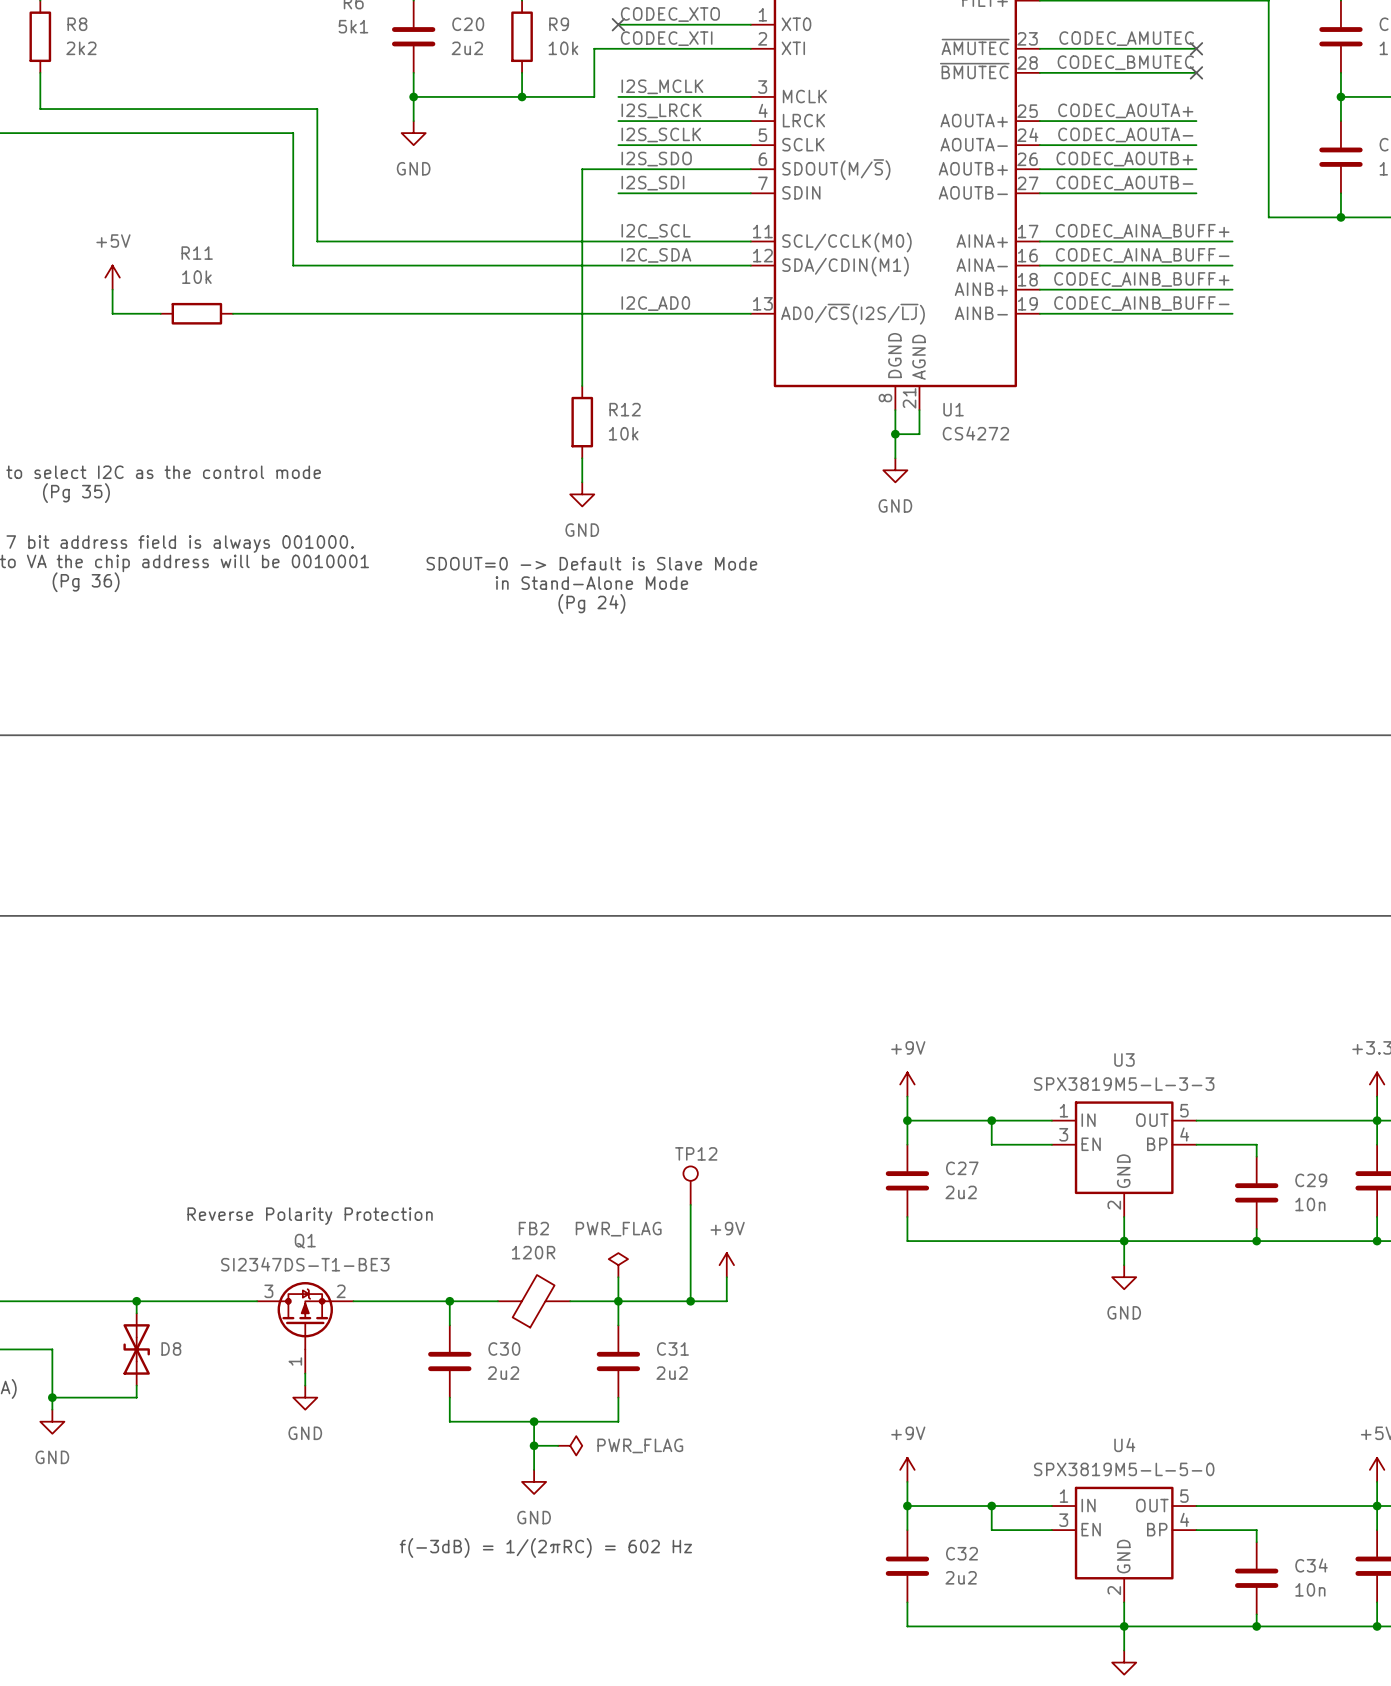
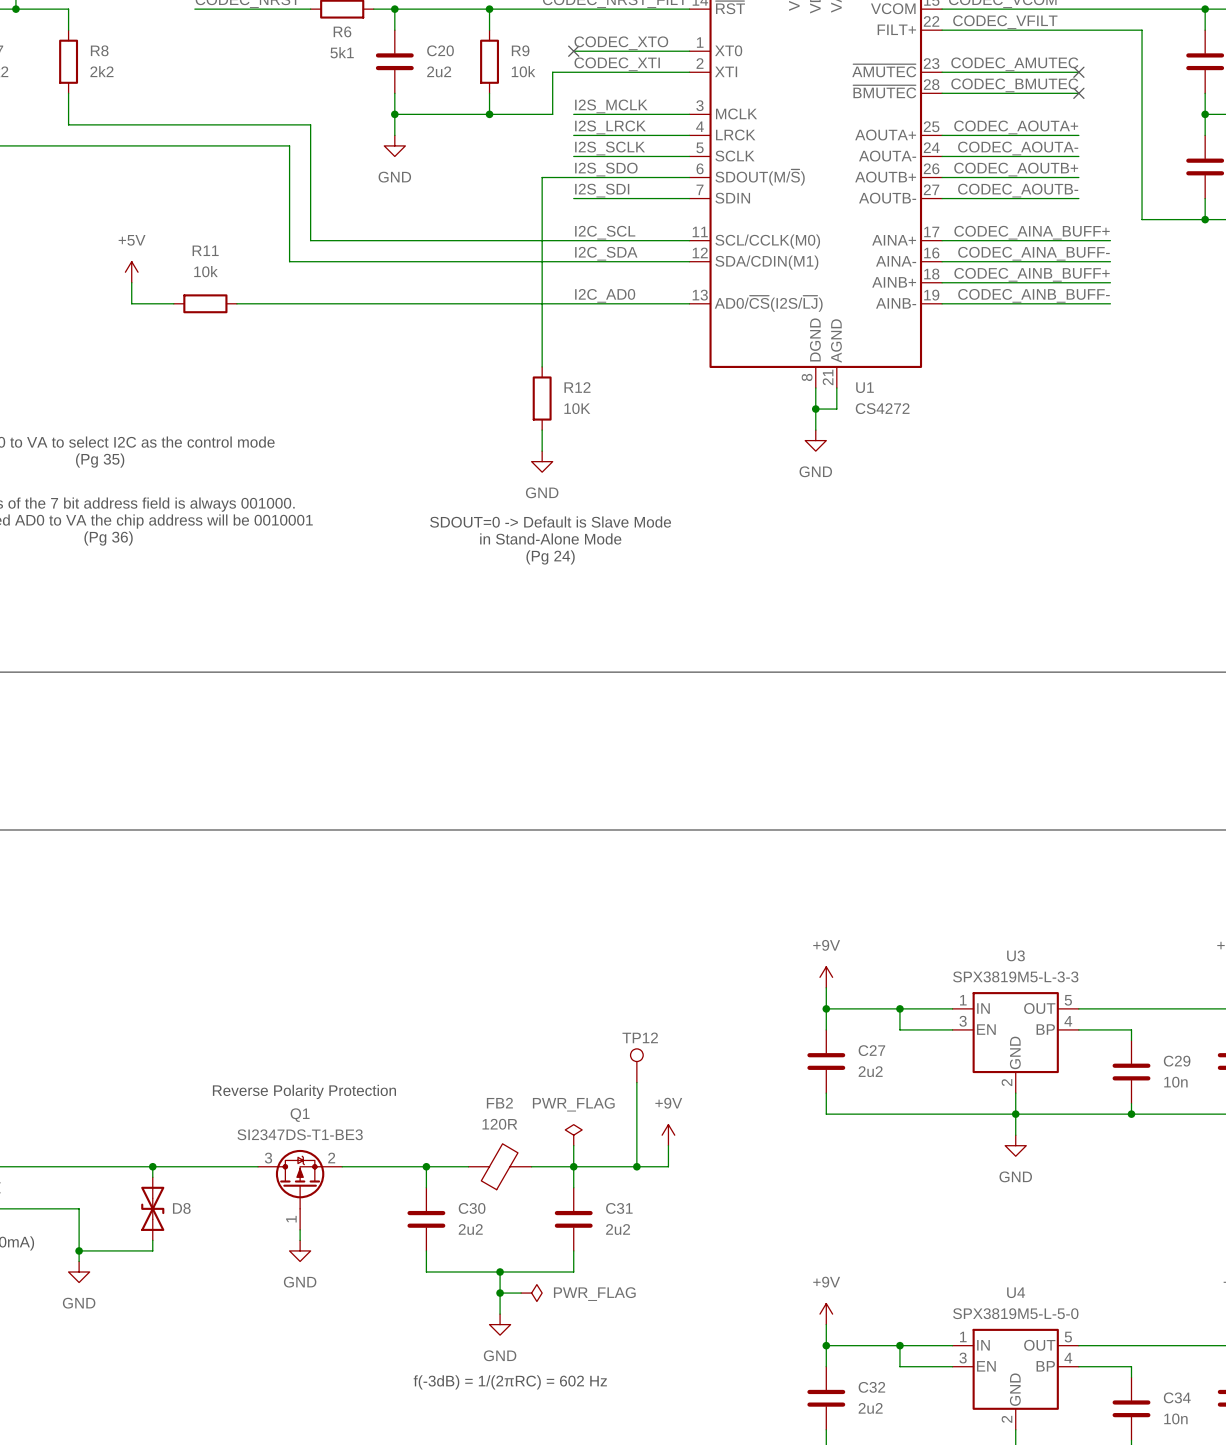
R12 value: 10k (623, 433) -> 10K (577, 408)

